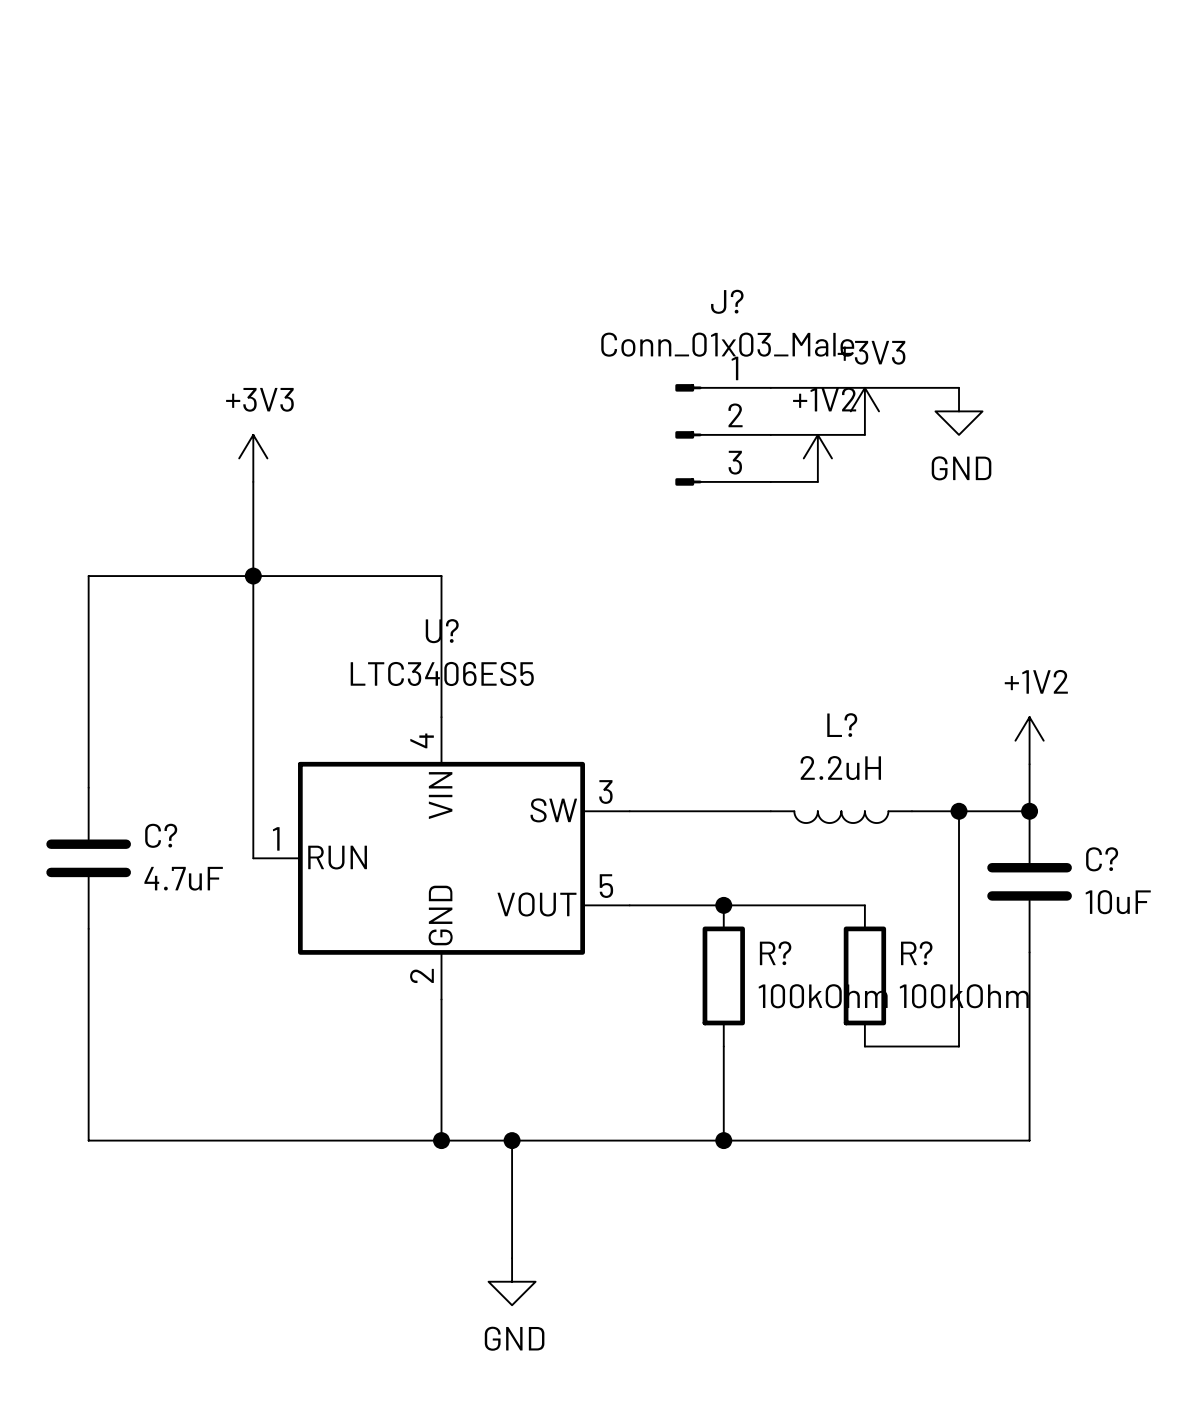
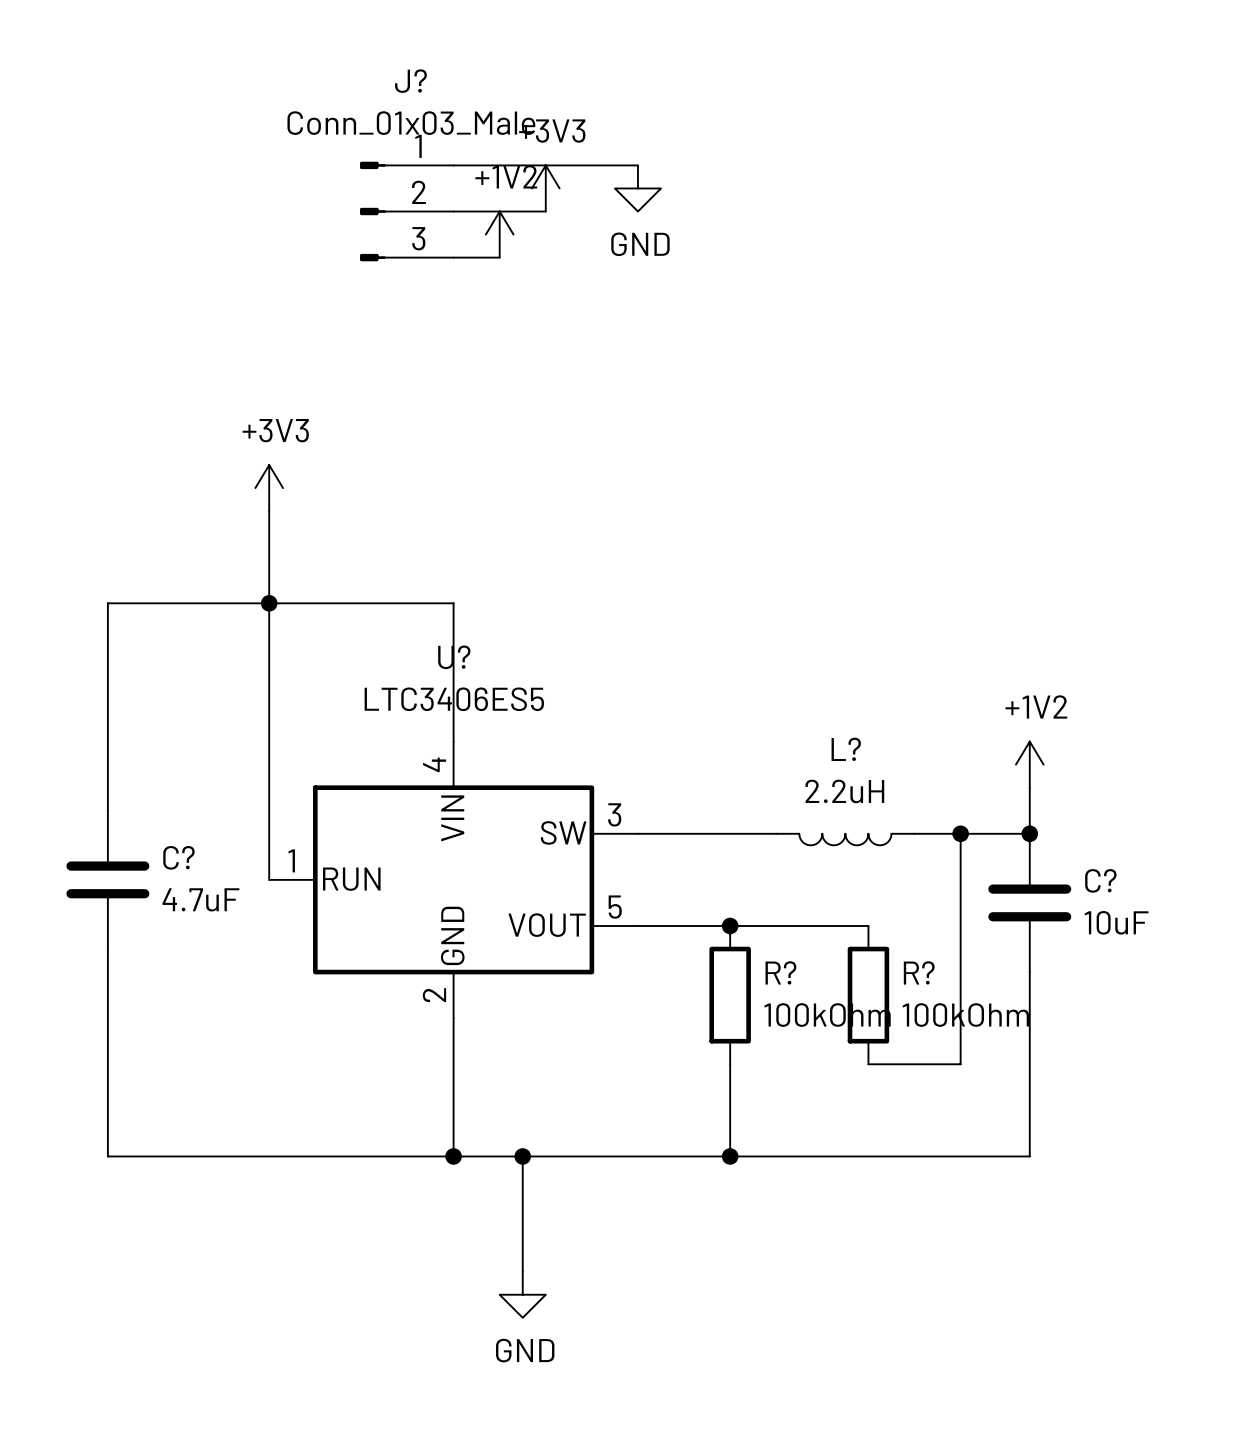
wire: (770, 387) (959, 387) -> (453, 165) (637, 165)
power symbol position: +3V3 (864, 411) -> +3V3 (545, 188)
power symbol position: GND (959, 411) -> GND (637, 188)
J? position: (723, 434) -> (406, 211)
wire: (770, 434) (864, 434) -> (453, 211) (545, 211)
power symbol position: +1V2 (817, 458) -> +1V2 (499, 234)
wire: (770, 481) (817, 481) -> (453, 257) (499, 257)

